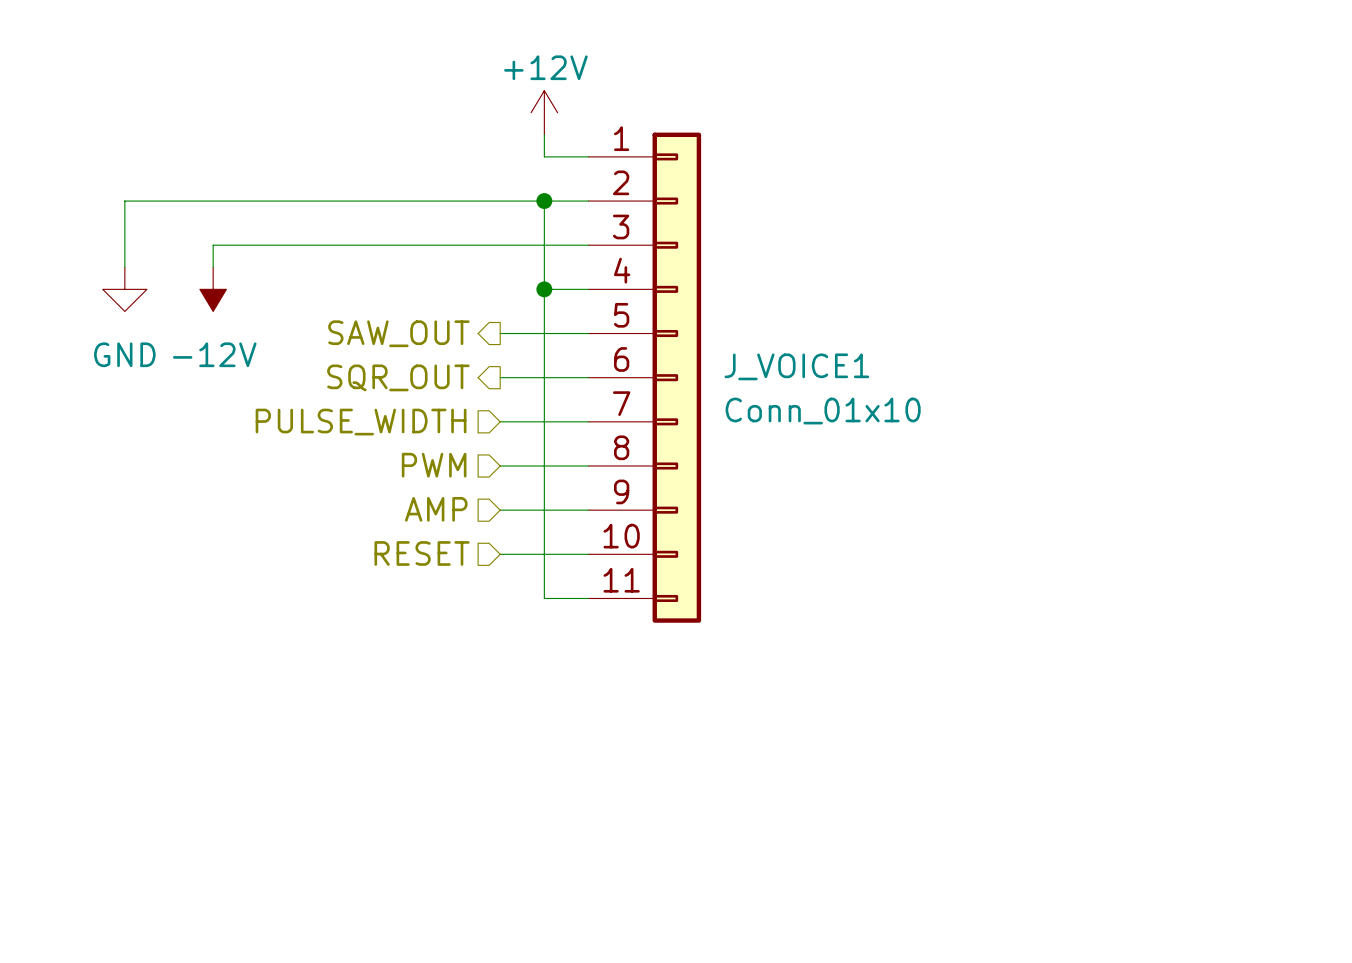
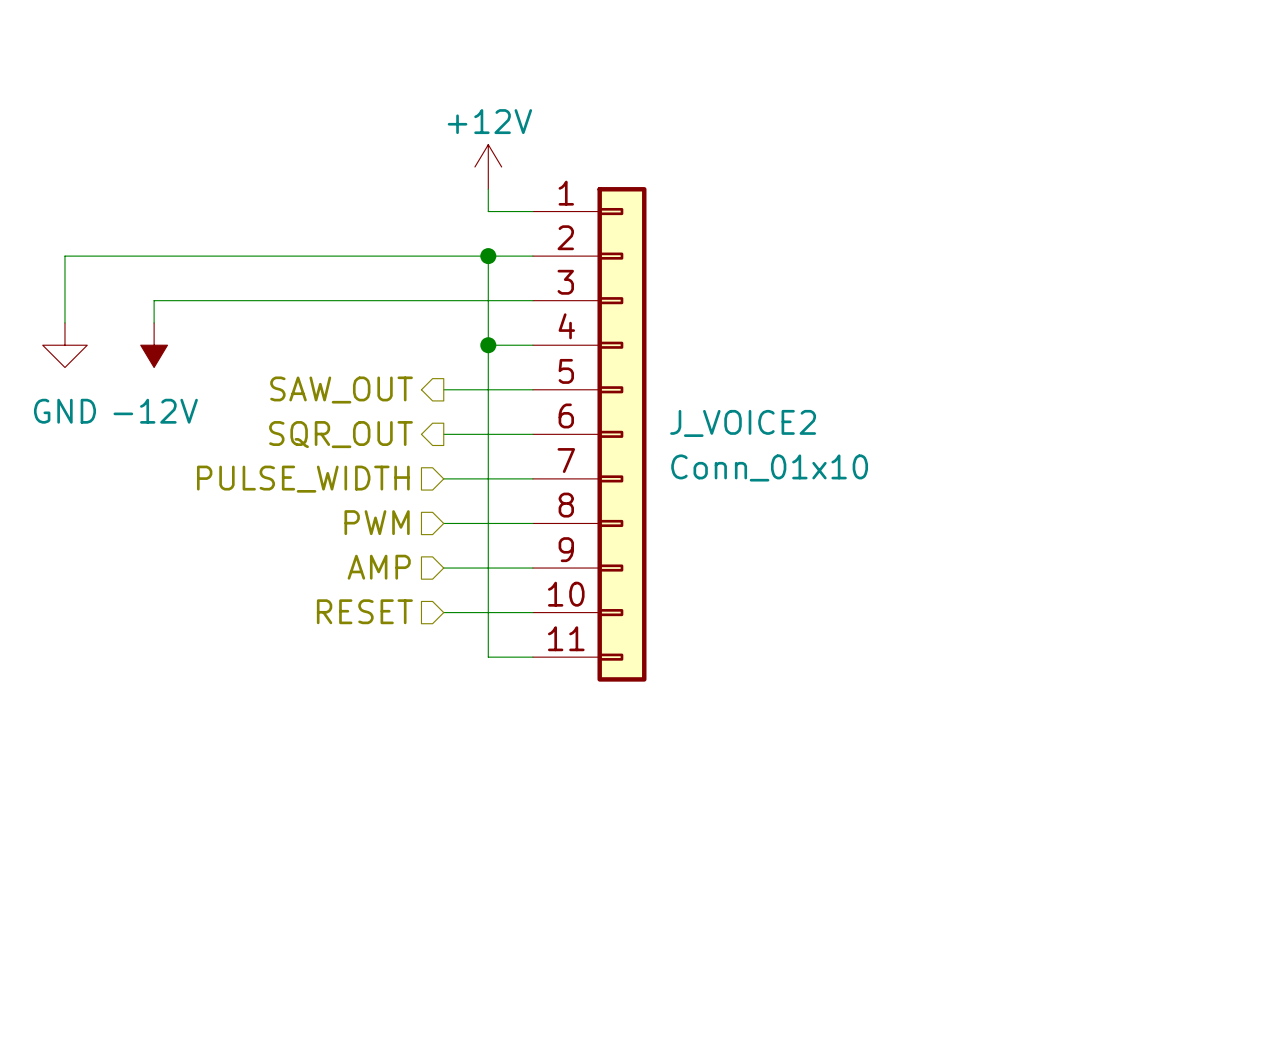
J_VOICE1 name: J_VOICE1 (796, 366) -> J_VOICE2 (743, 423)

